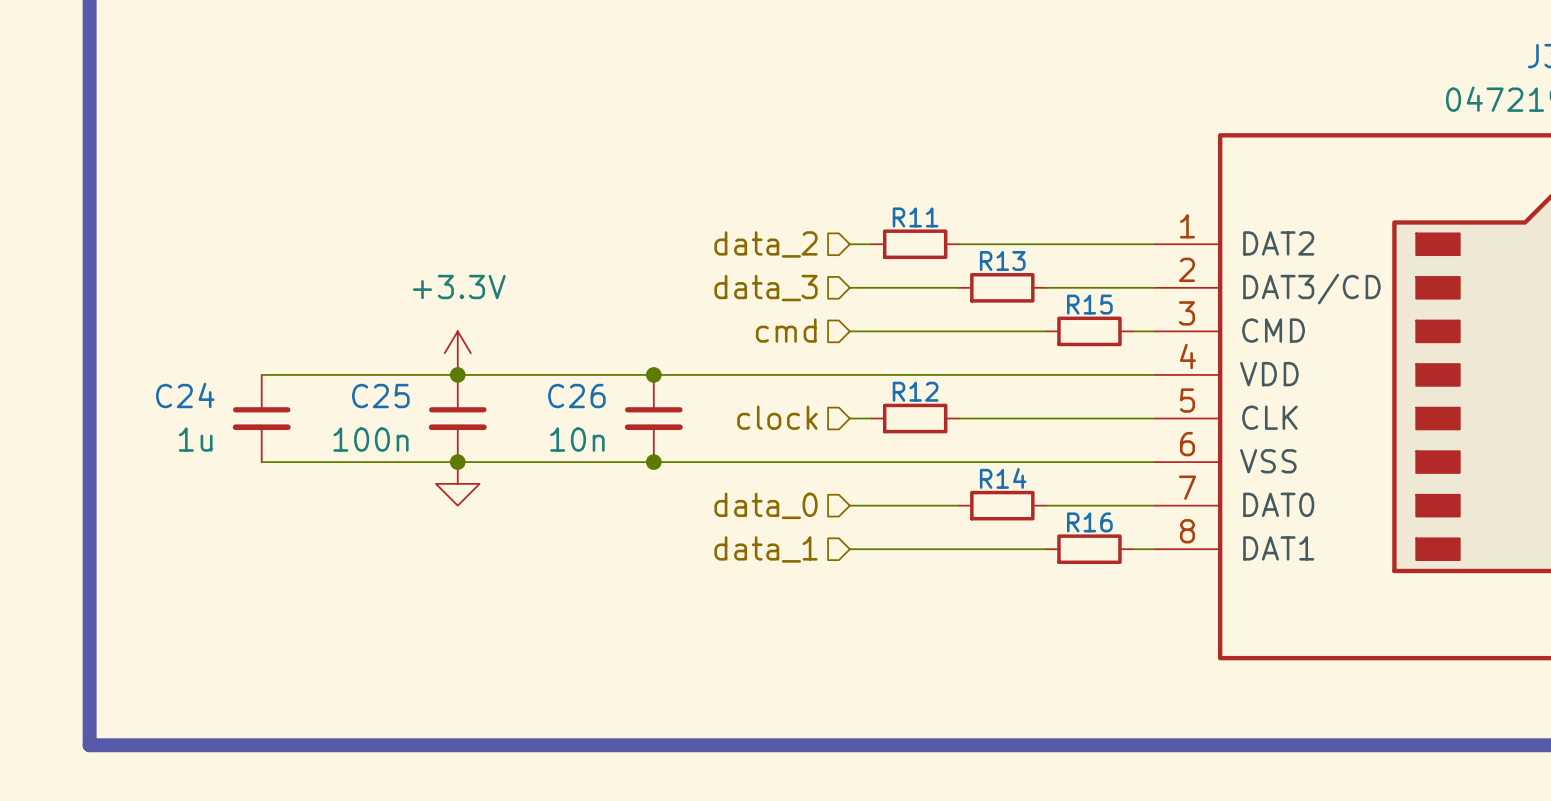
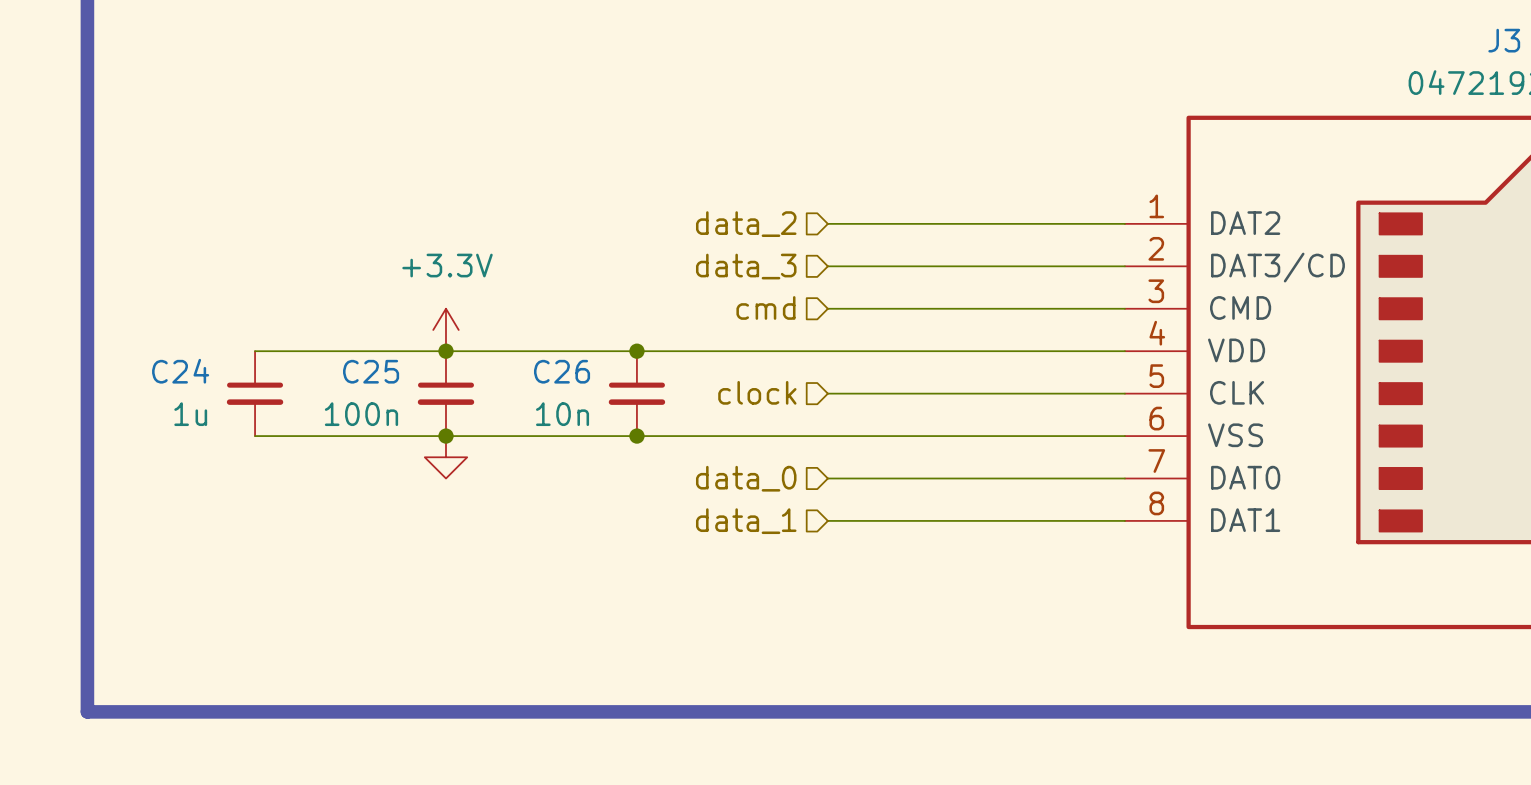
wire: none -> (849, 223) (934, 223)
R11: (915, 244) -> none
wire: none -> (934, 266) (1018, 266)
R13: (1002, 287) -> none
wire: none -> (1018, 308) (1103, 308)
R15: (1089, 331) -> none
wire: none -> (849, 393) (934, 393)
R12: (915, 418) -> none
wire: none -> (934, 478) (1018, 478)
R14: (1002, 505) -> none
wire: none -> (1018, 520) (1103, 520)
R16: (1089, 549) -> none

